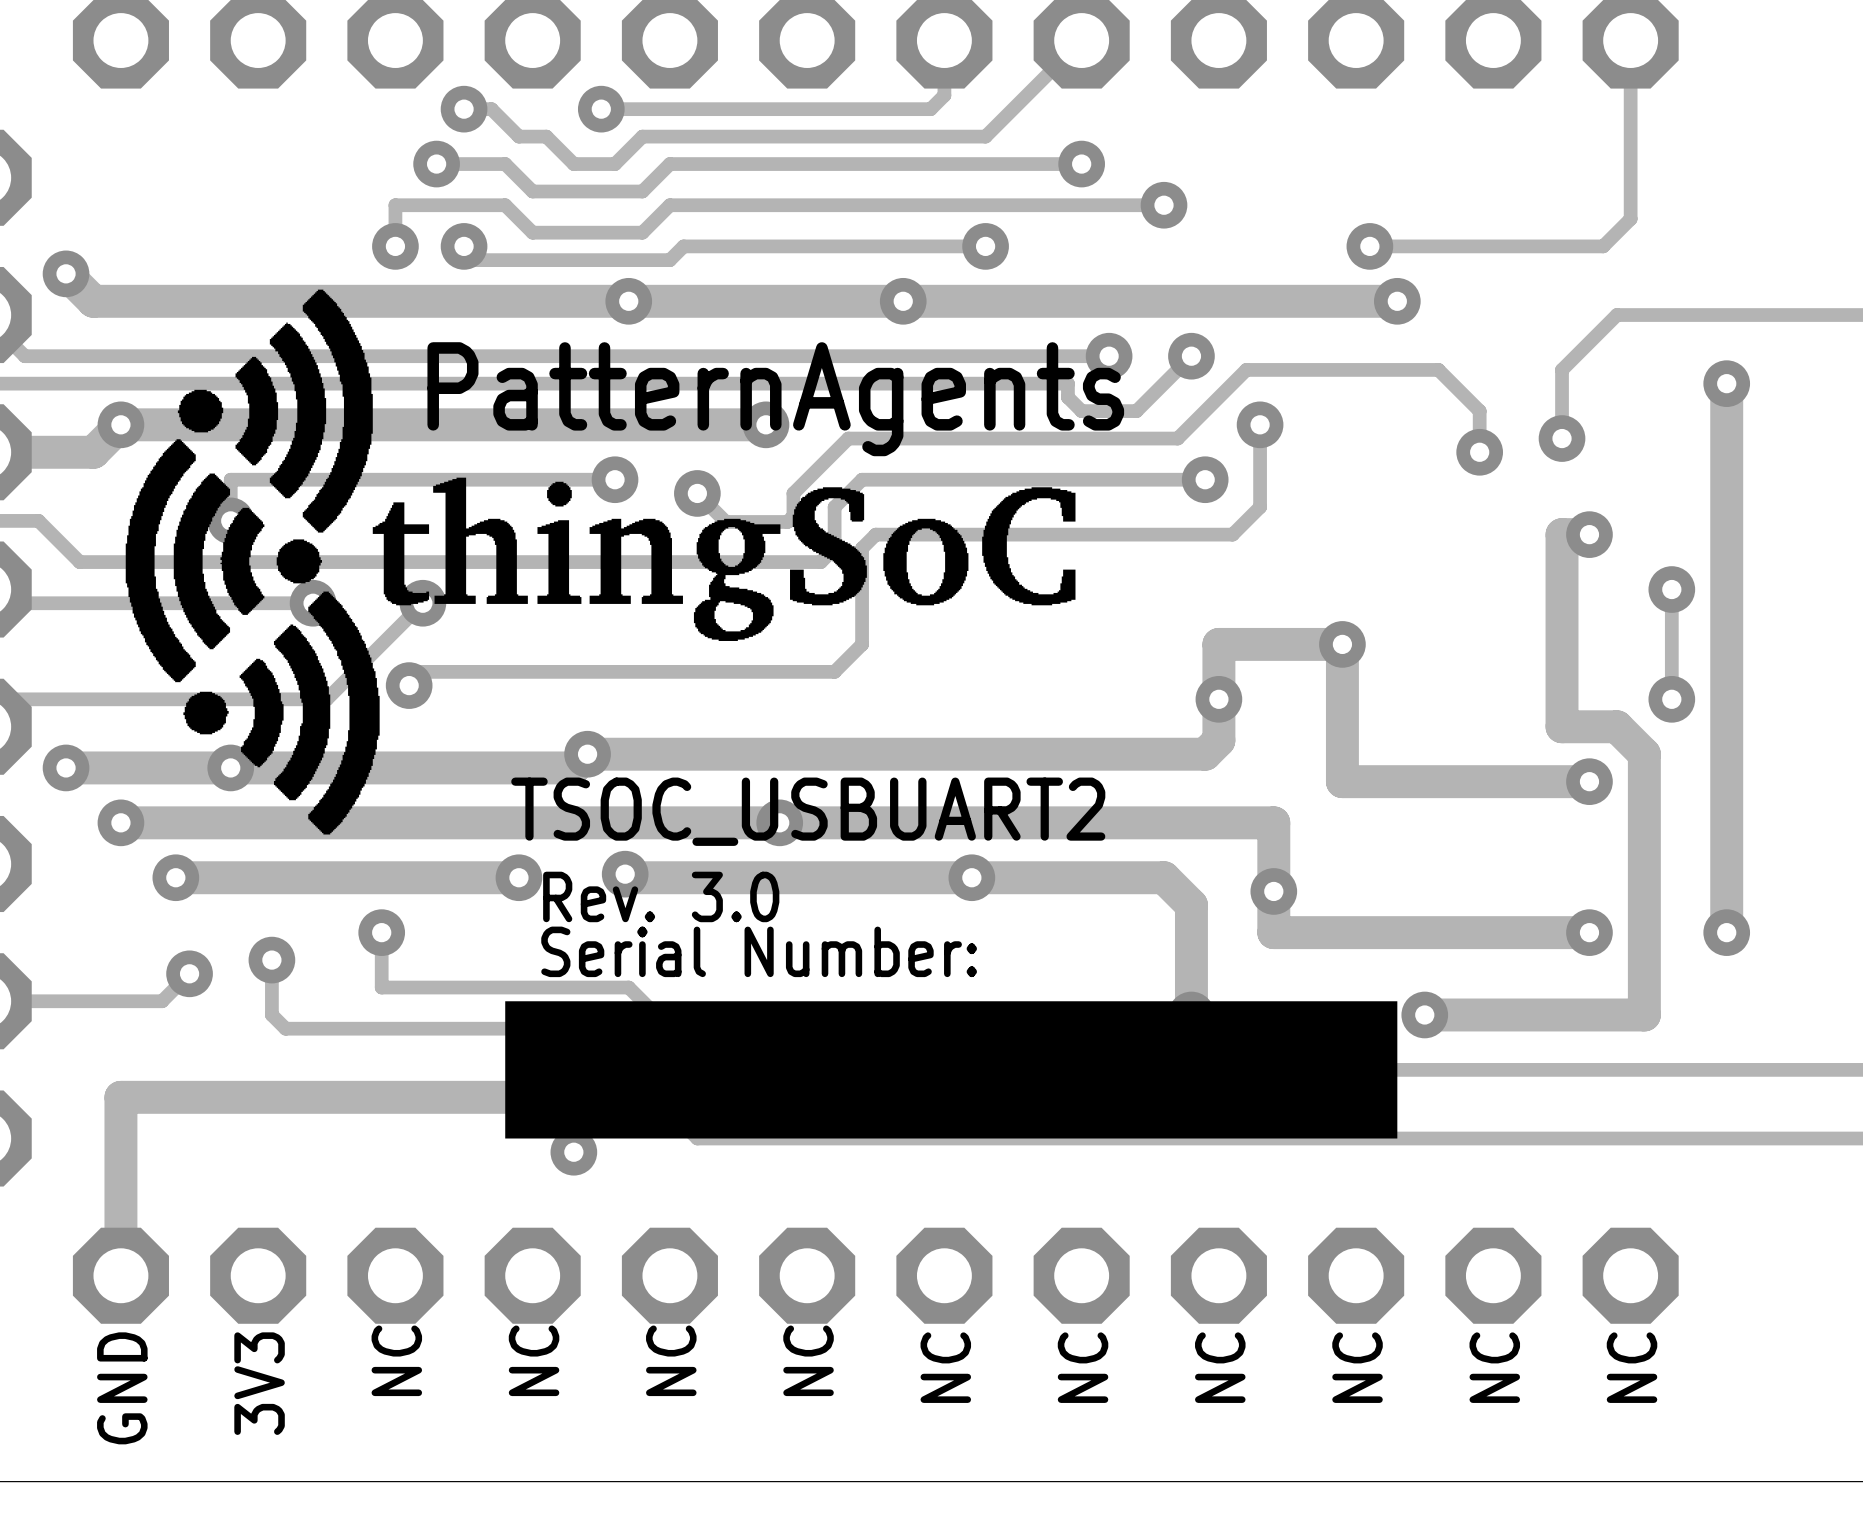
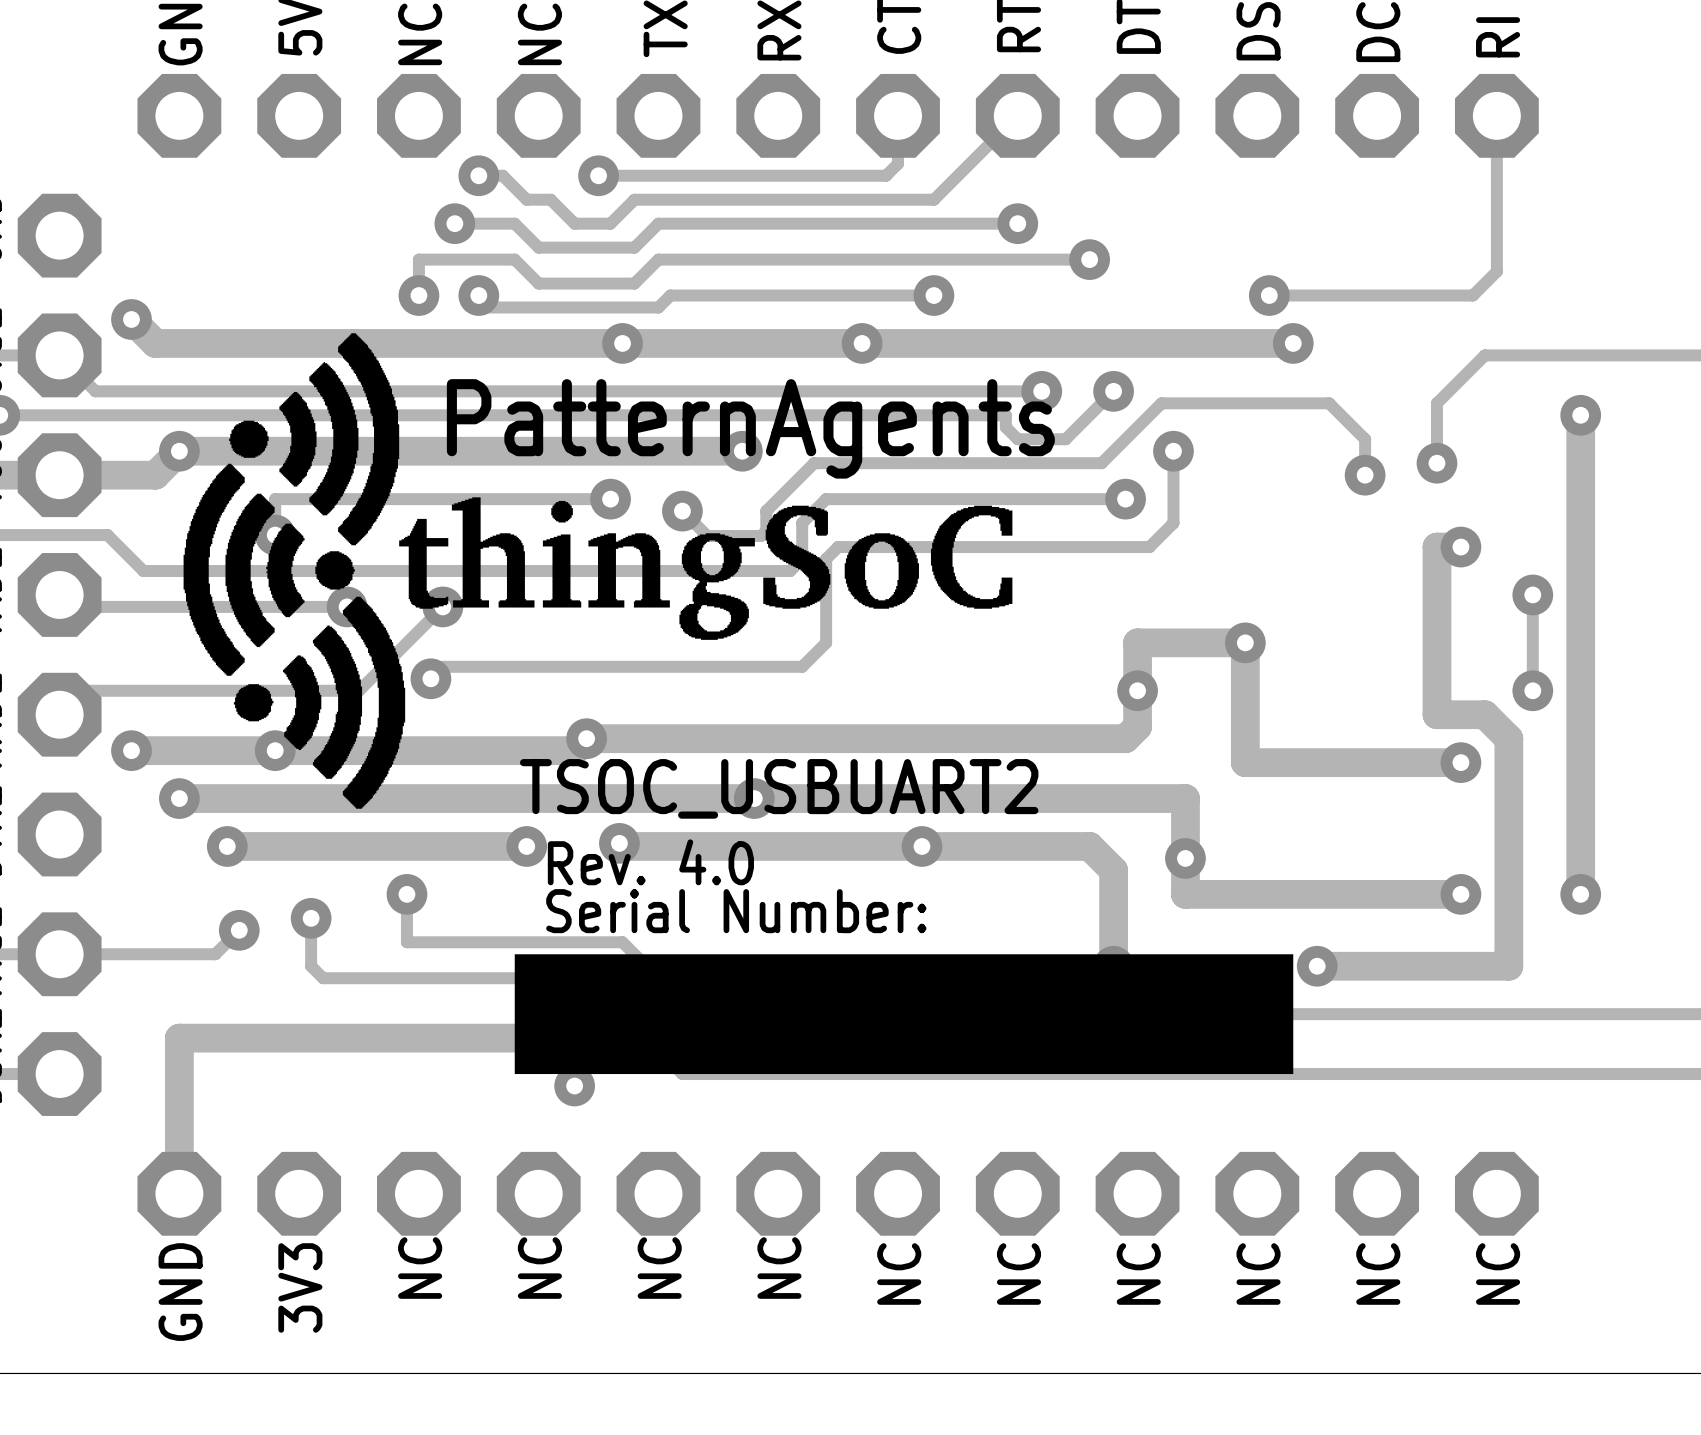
text: Rev. 3.0 (661, 896) -> Rev. 4.0 (650, 862)

